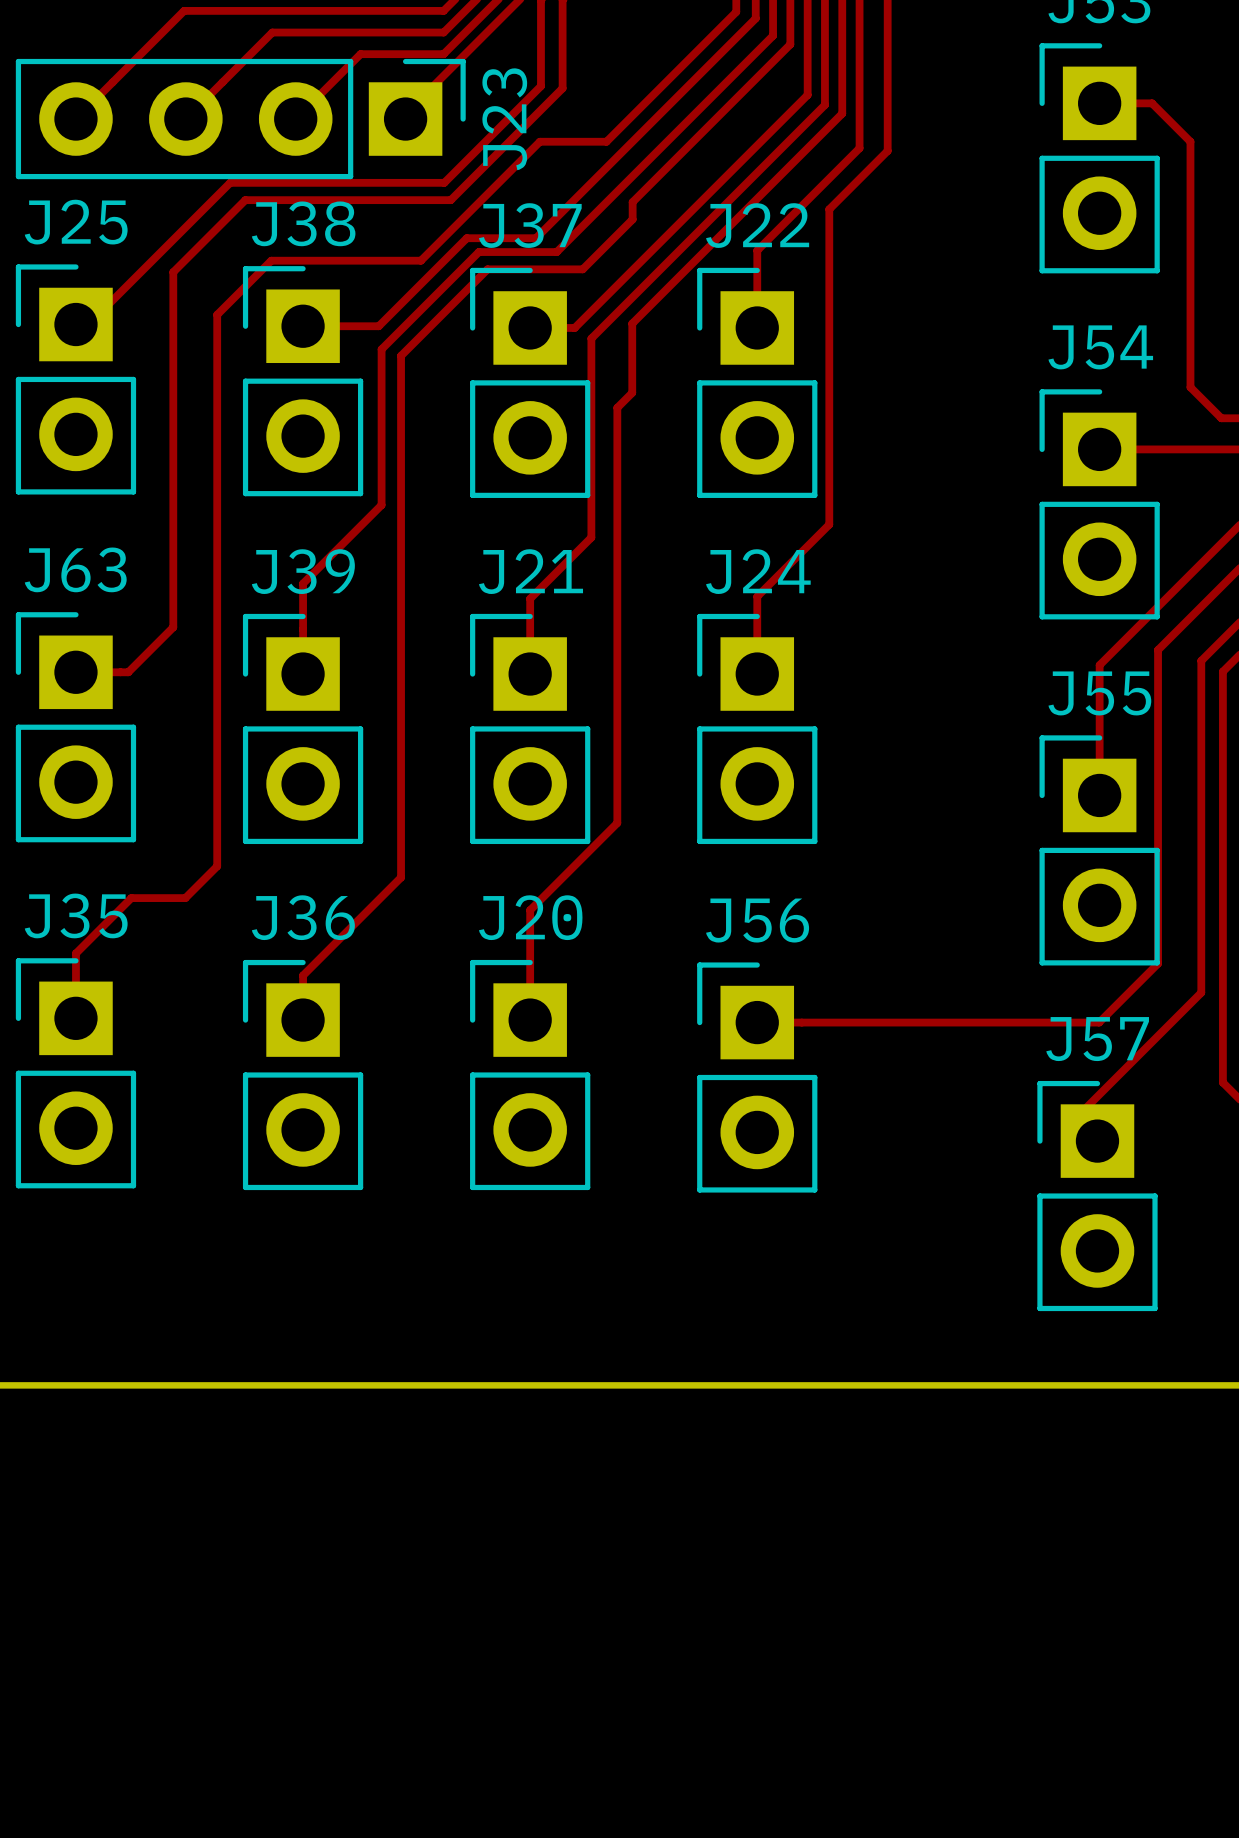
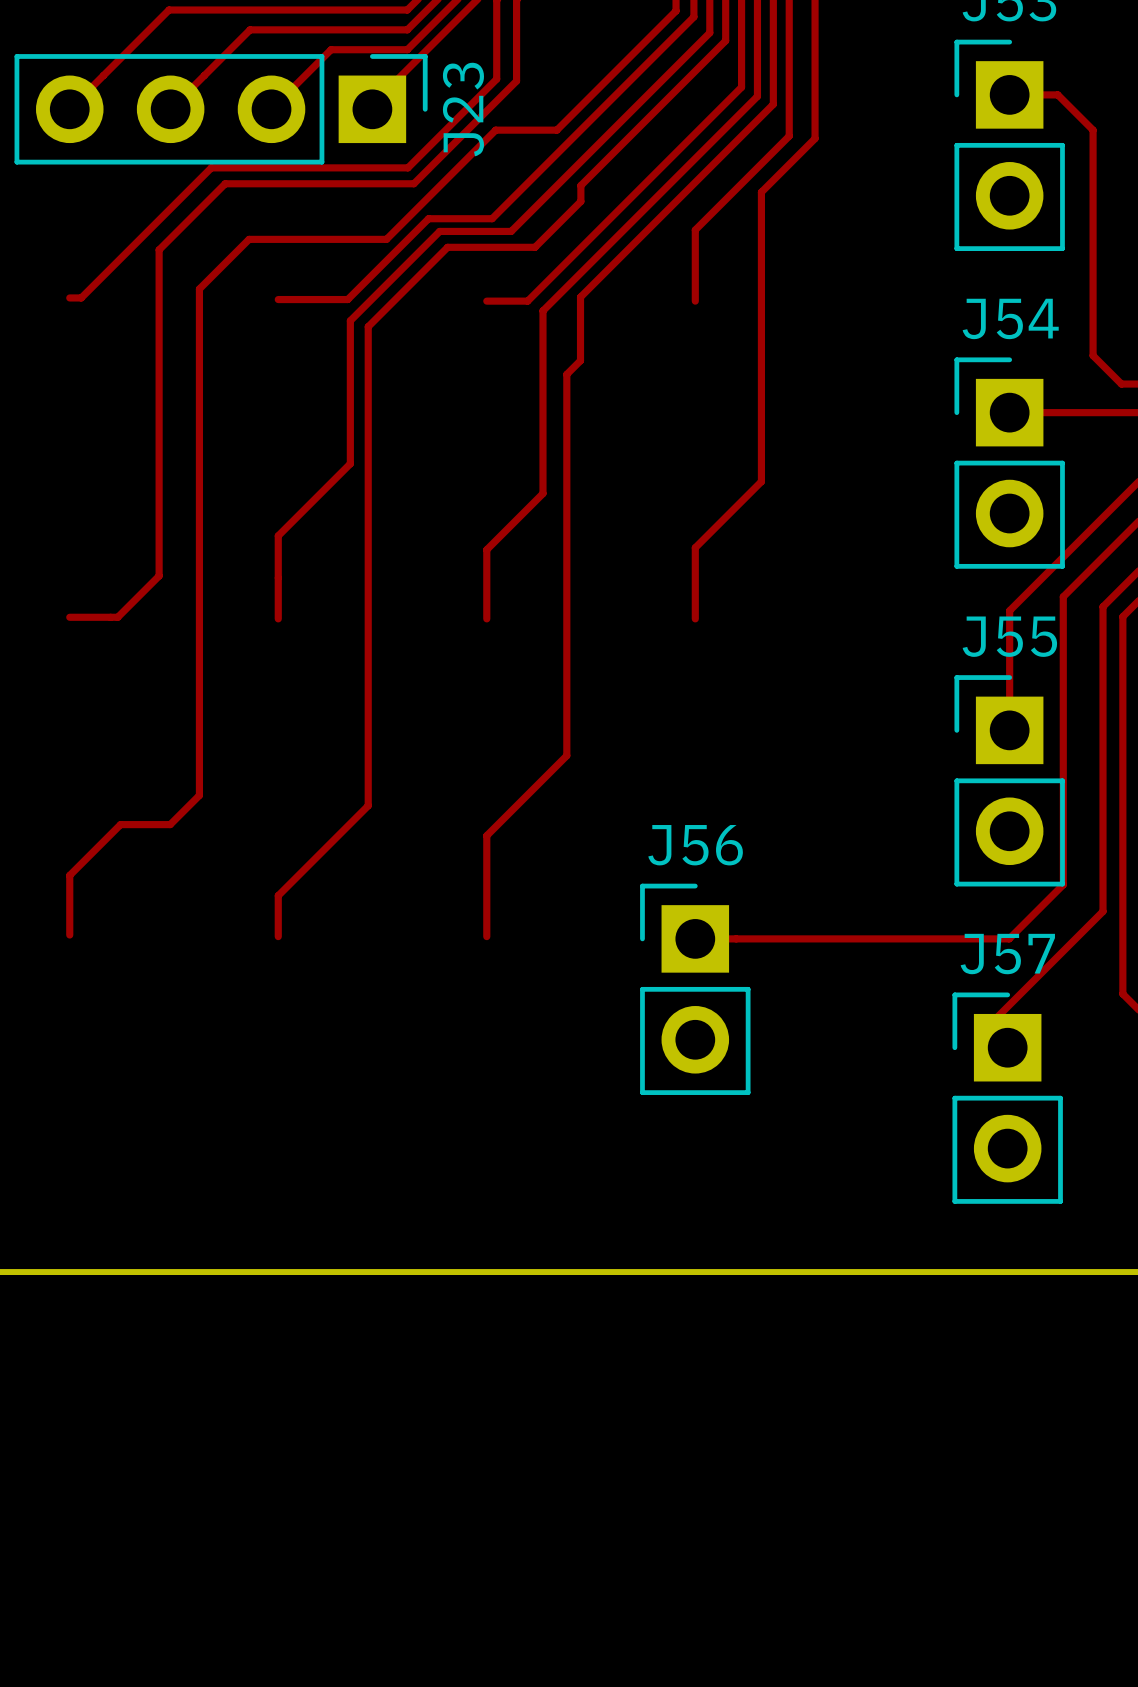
J25: (75, 379) -> none
J38: (303, 381) -> none
J37: (530, 382) -> none
J22: (757, 382) -> none
J63: (75, 727) -> none
J39: (303, 728) -> none
J21: (530, 728) -> none
J24: (757, 728) -> none
J35: (75, 1073) -> none
J36: (303, 1075) -> none
J20: (530, 1075) -> none

